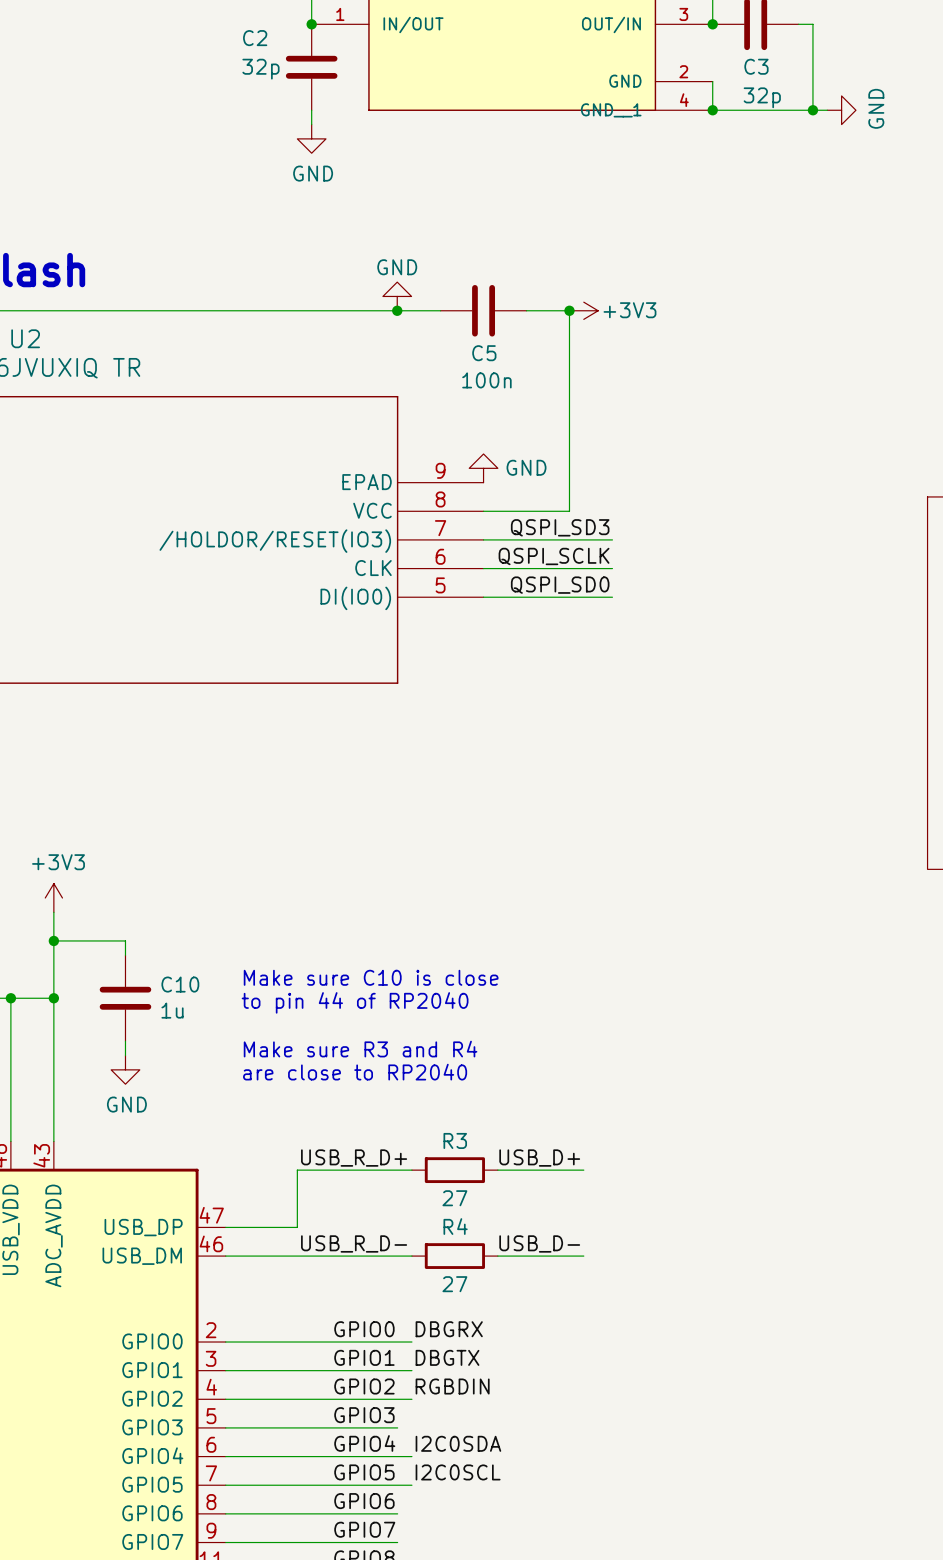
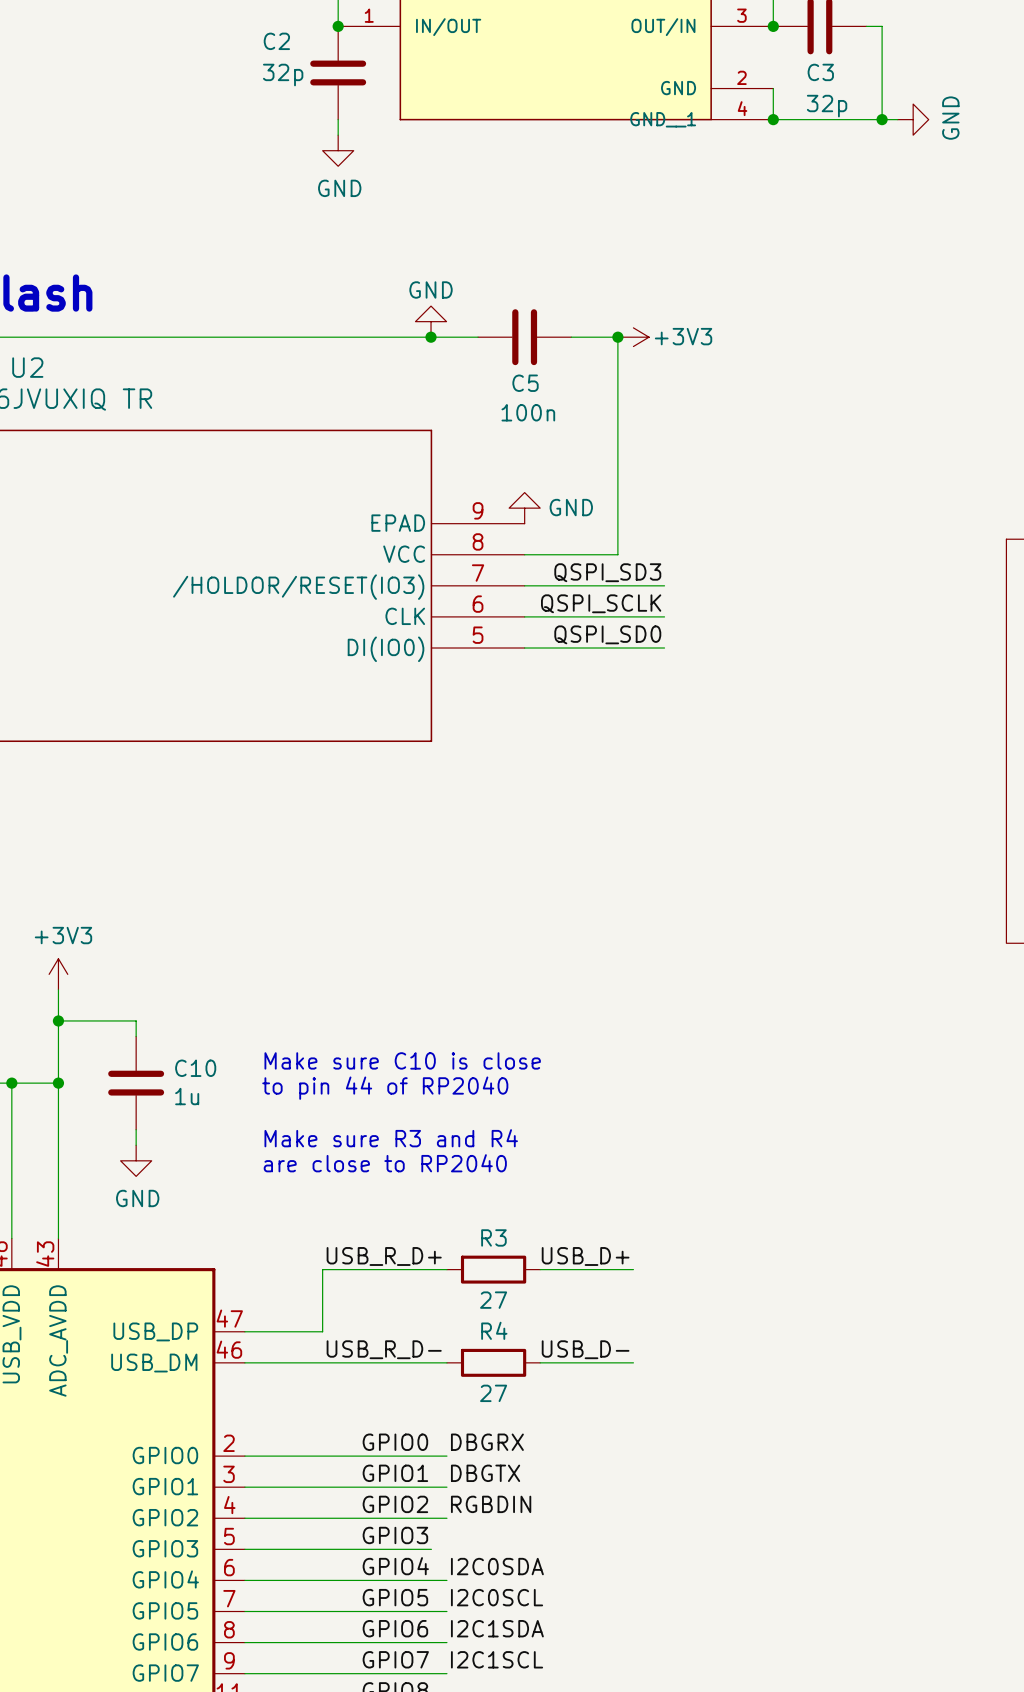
label: none -> I2C1SDA (497, 1628)
wire: none -> (431, 1642) (446, 1642)
label: none -> I2C1SCL (497, 1659)
wire: none -> (431, 1673) (446, 1673)

